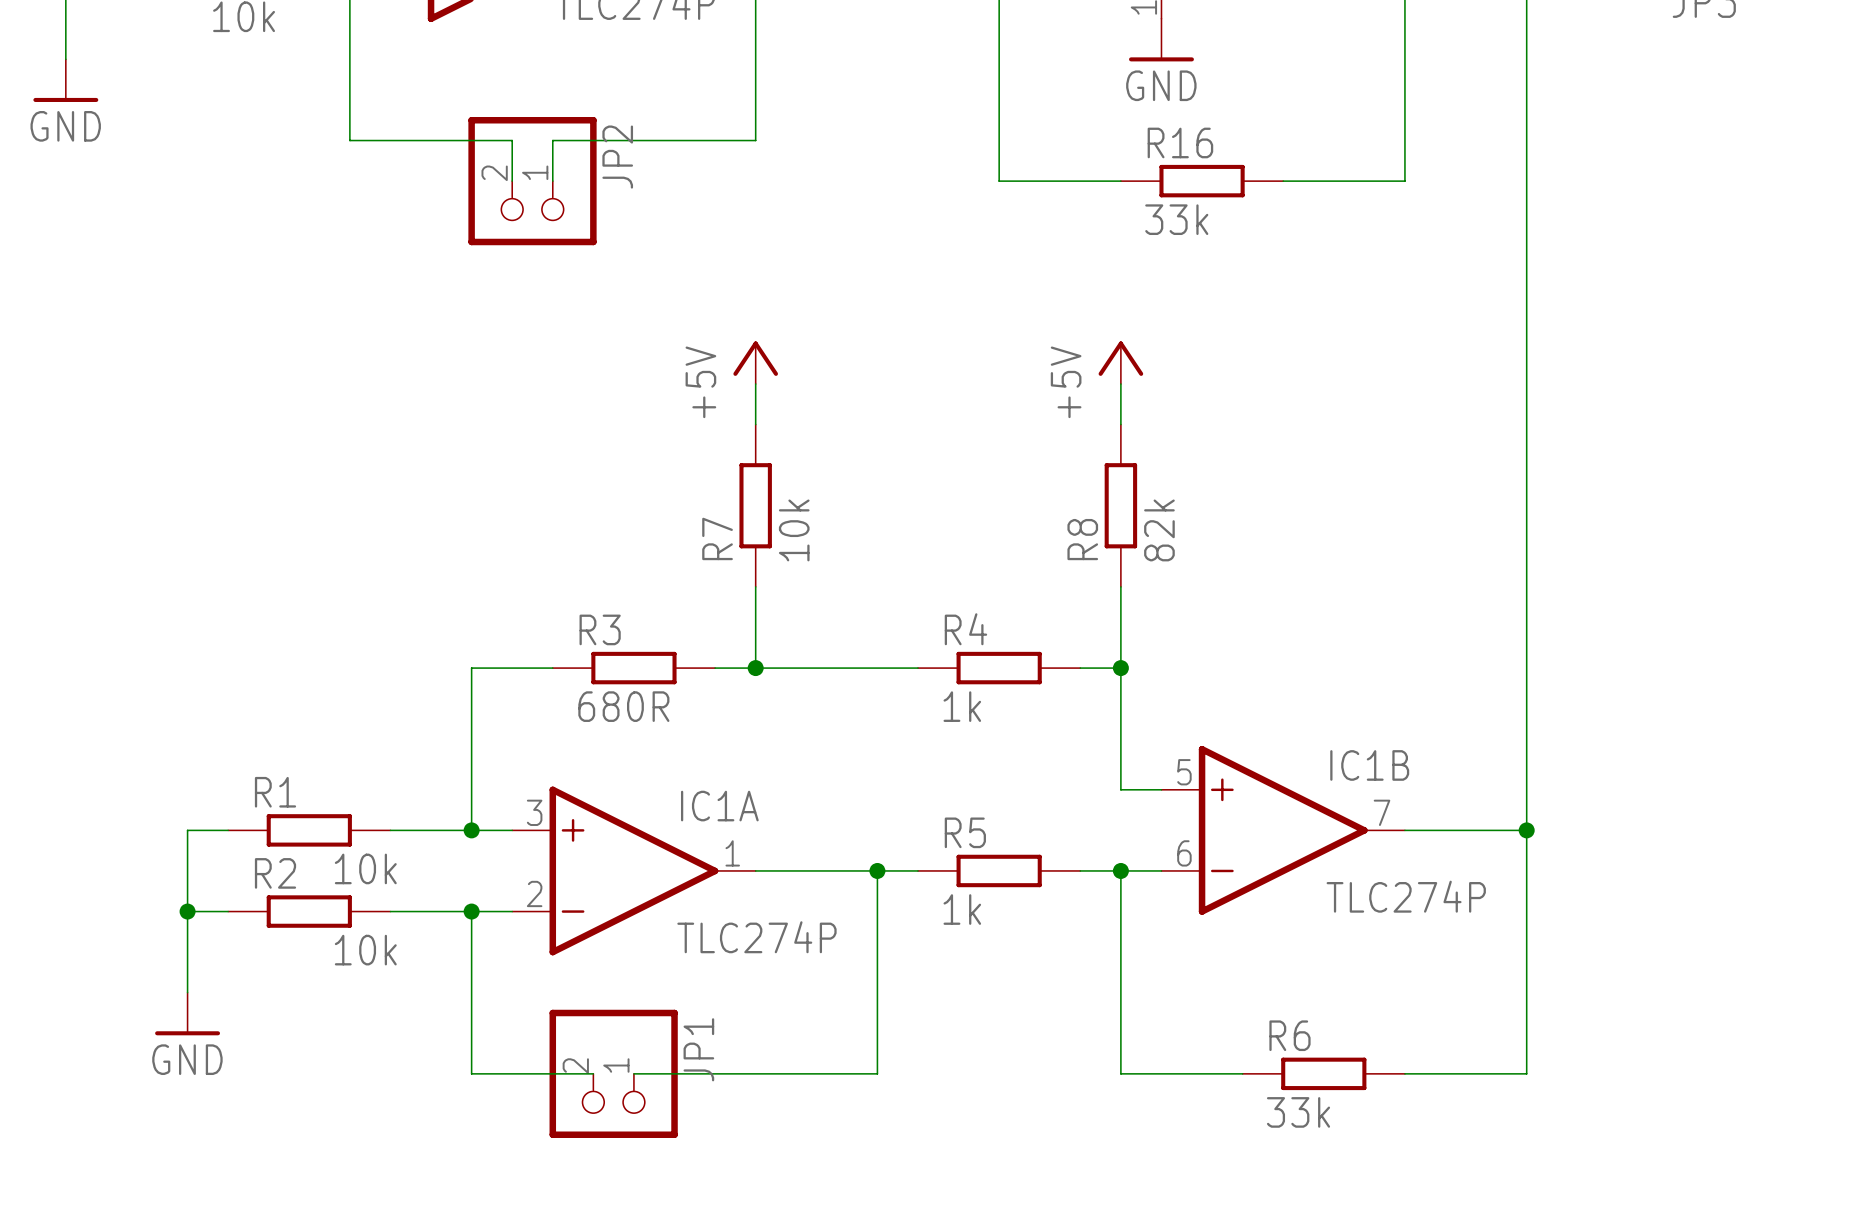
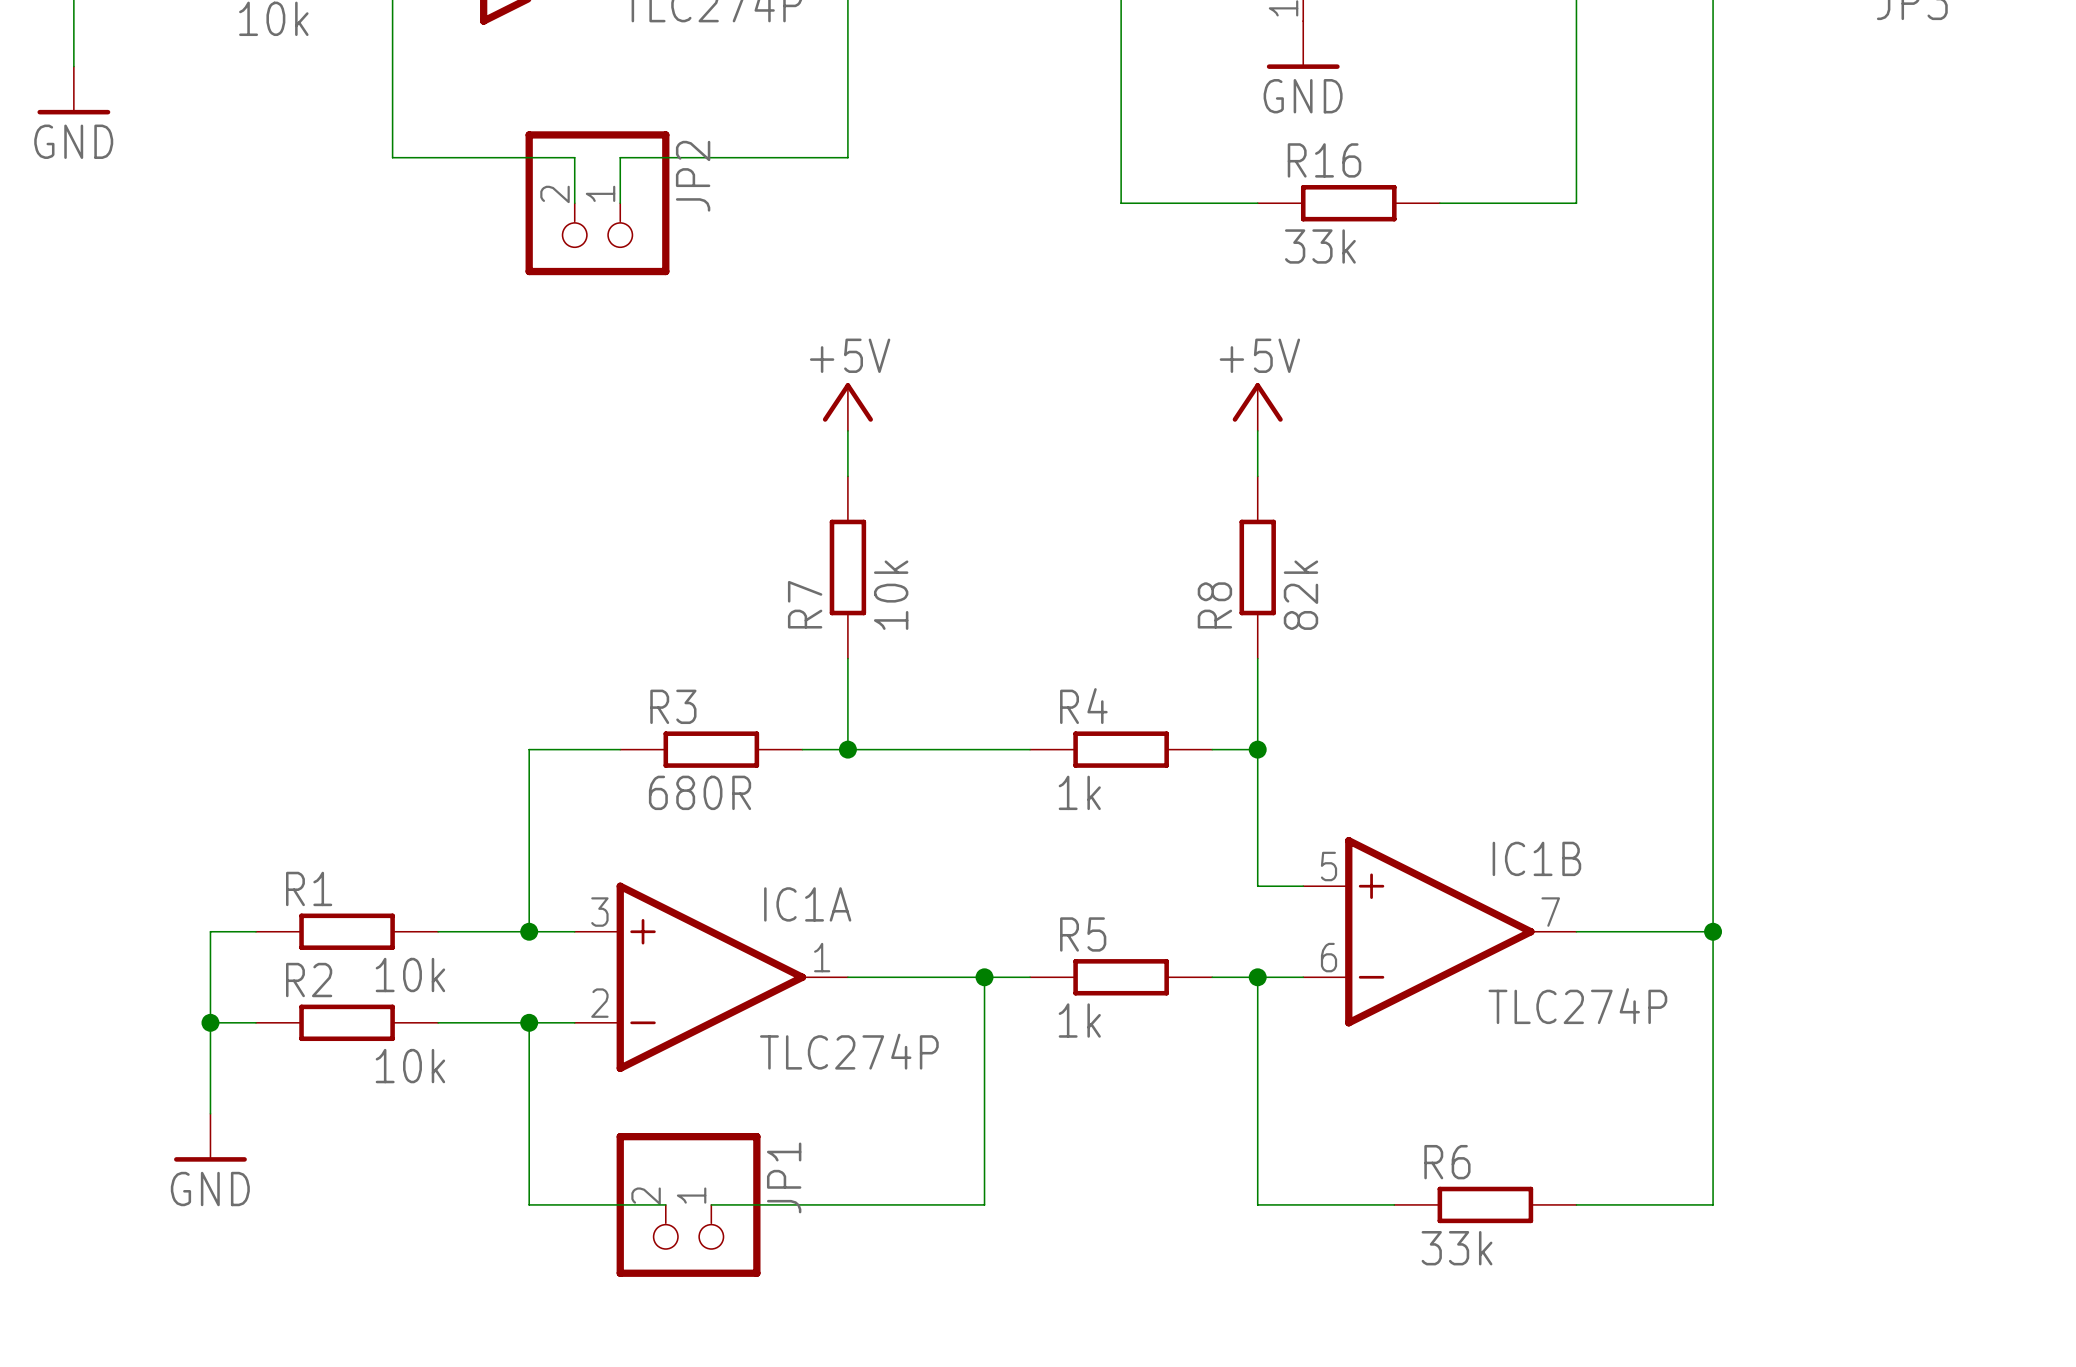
power symbol text rotation: 0° (700, 382) -> 90° clockwise (850, 355)
power symbol text rotation: 0° (1066, 382) -> 90° clockwise (1259, 355)

